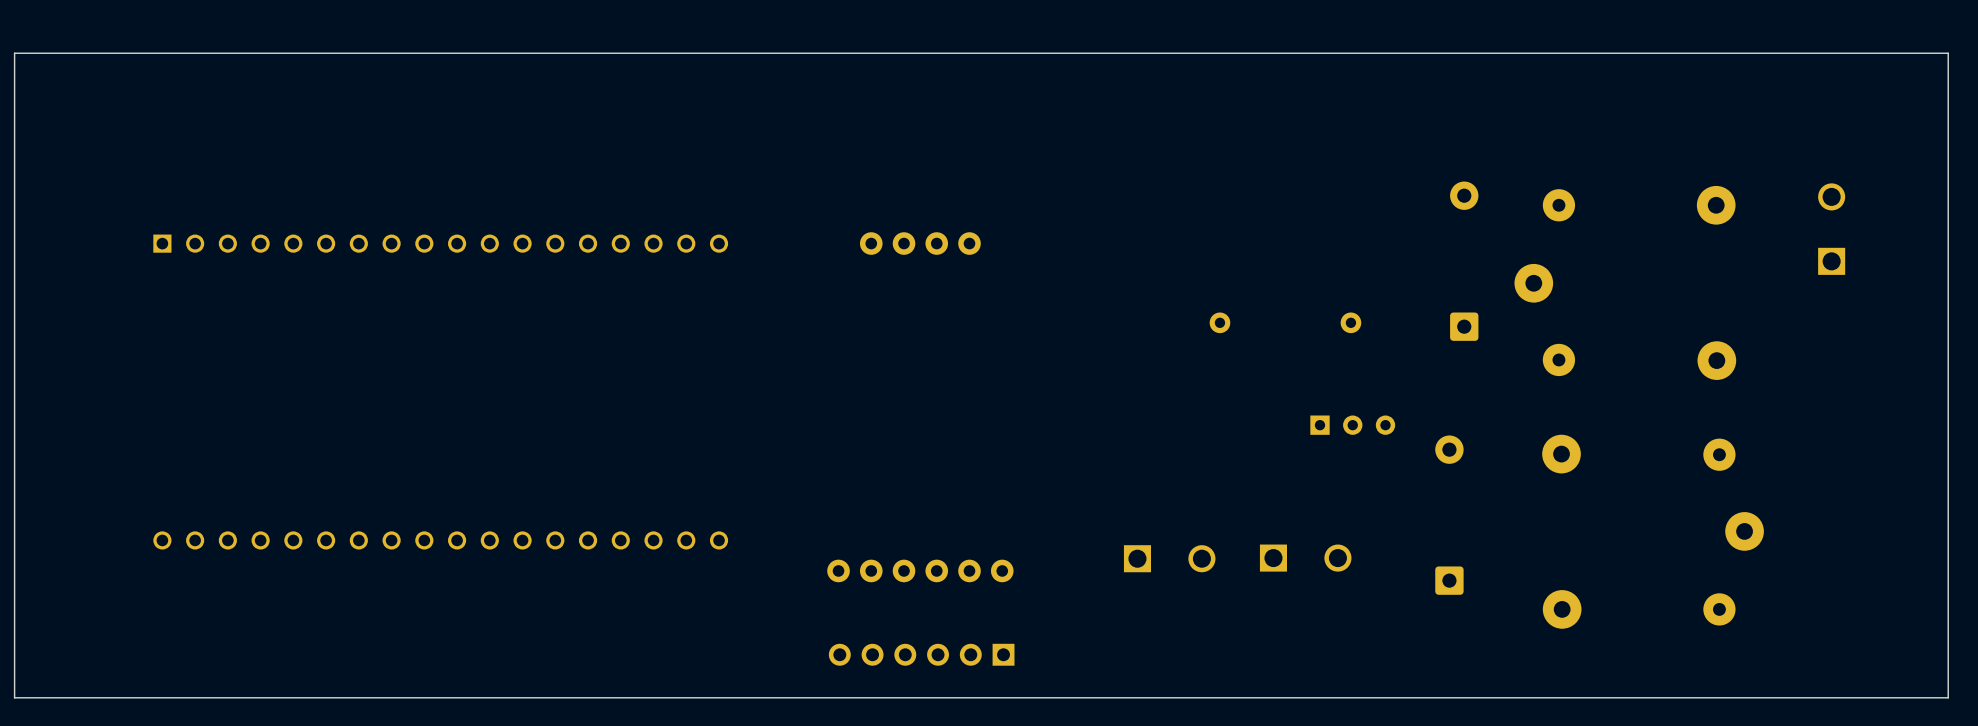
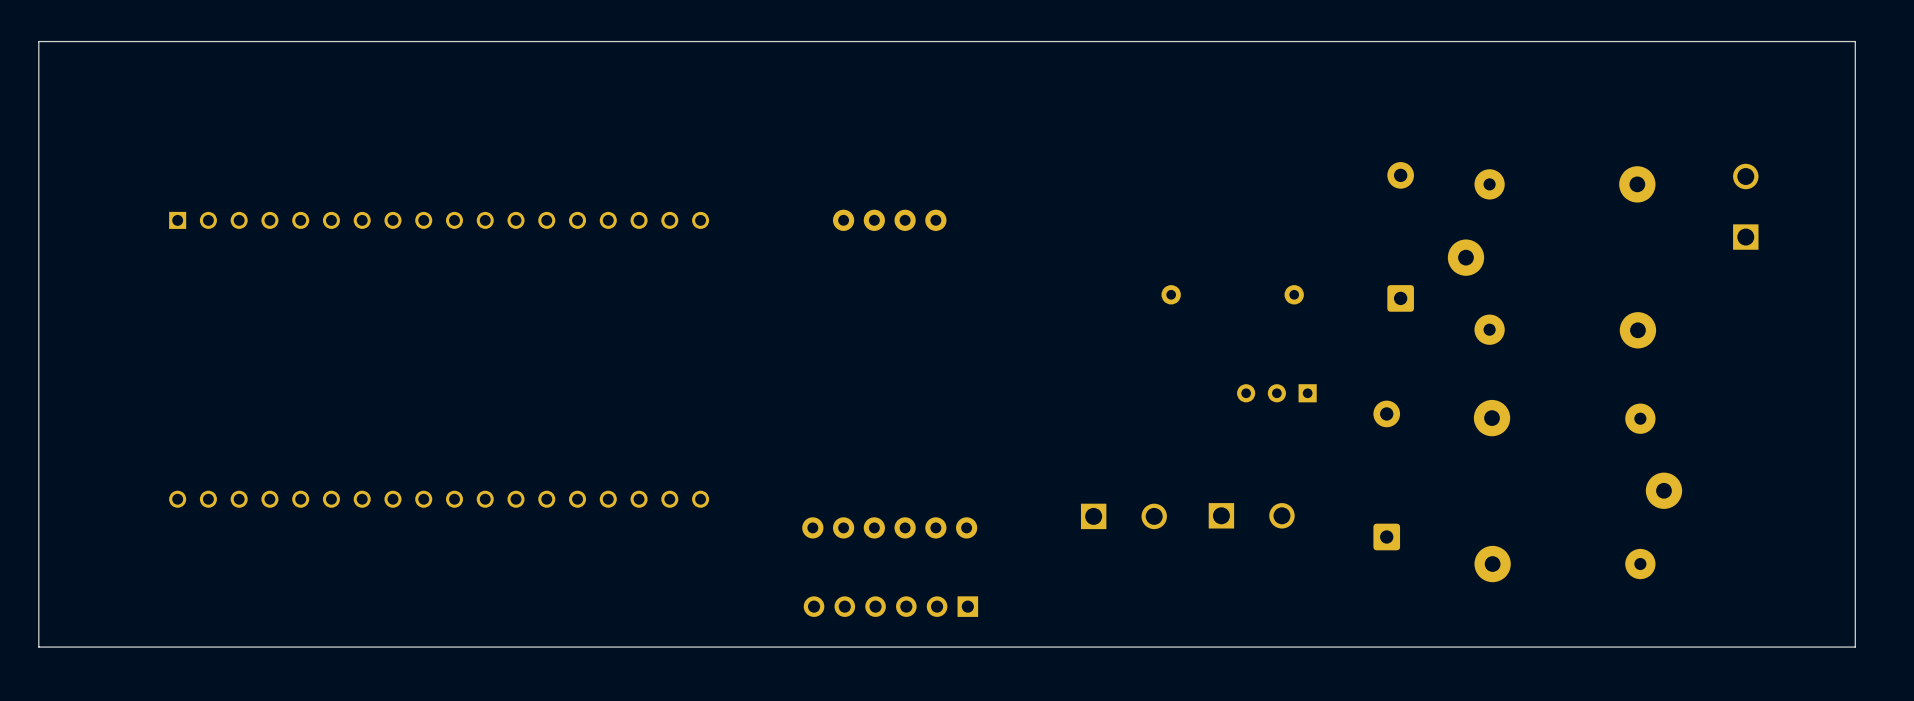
part rotation: 0° (1352, 425) -> 180° (1276, 393)

